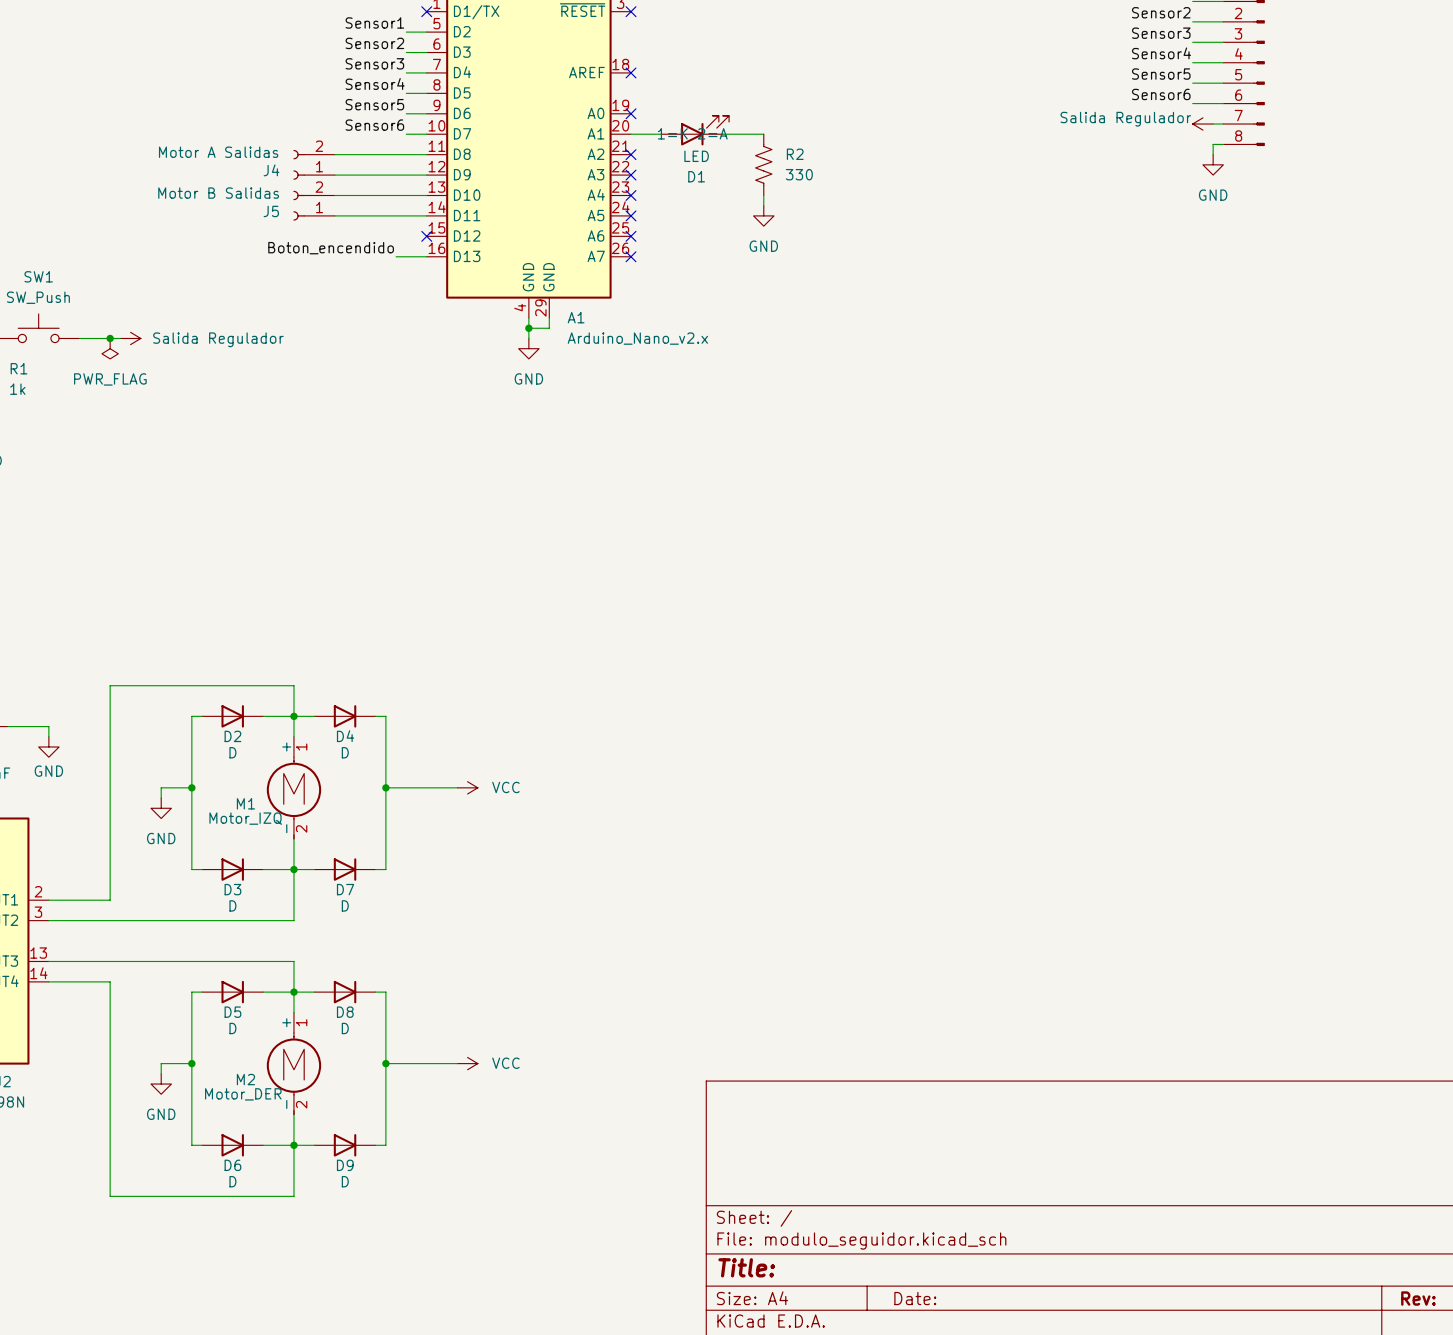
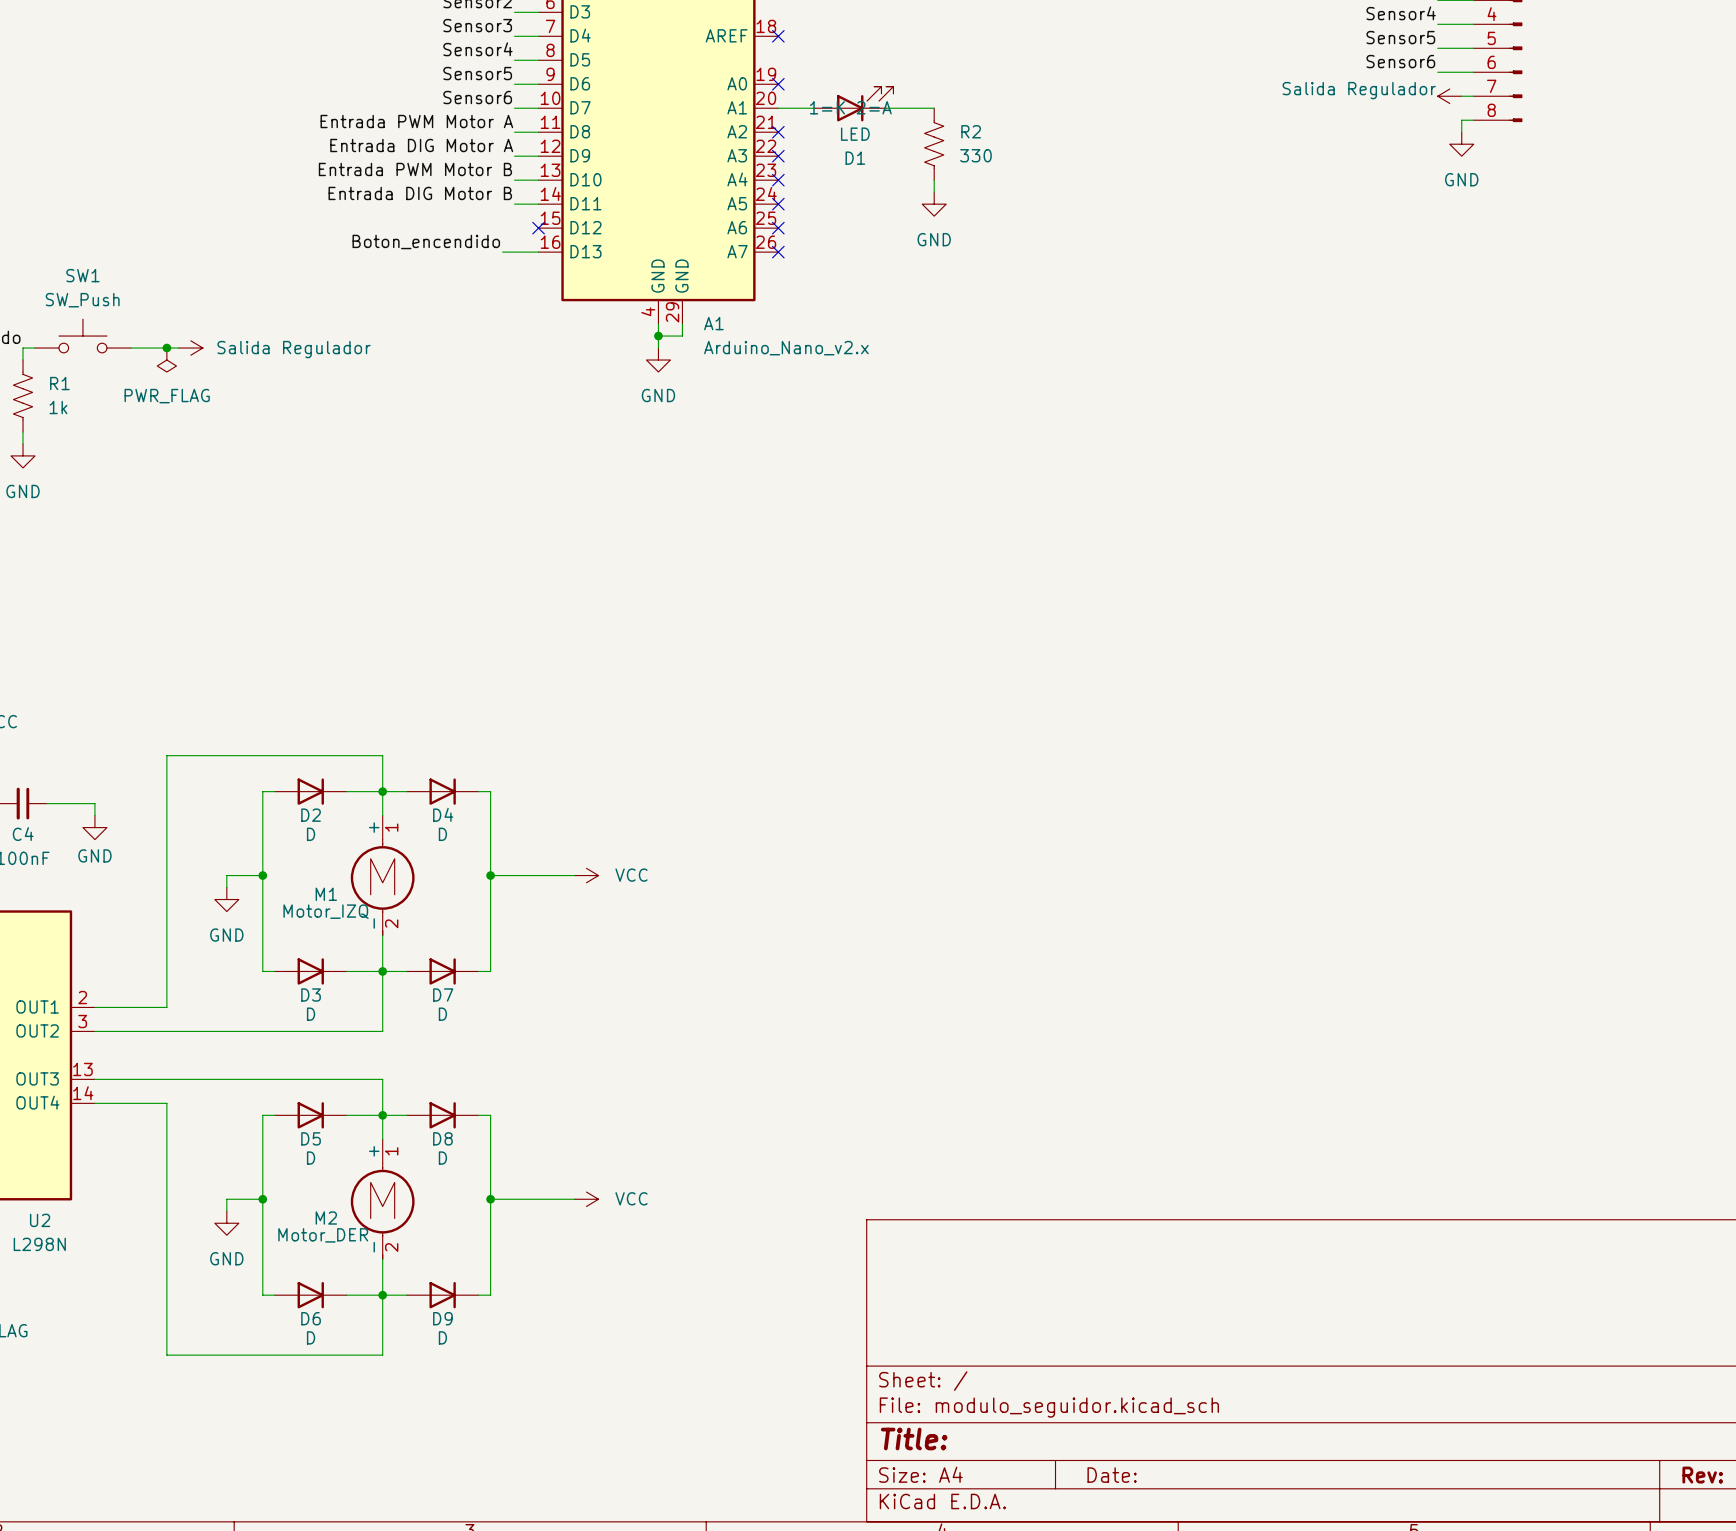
label: none -> Entrada PWM Motor A (416, 121)
wire: (334, 154) (406, 154) -> none
J4: Motor A Salidas (314, 164) -> none
label: none -> Entrada DIG Motor A (421, 145)
wire: (334, 175) (406, 175) -> none
label: none -> Entrada PWM Motor B (415, 169)
wire: (334, 195) (406, 195) -> none
J5: Motor B Salidas (314, 205) -> none
label: none -> Entrada DIG Motor B (420, 193)
wire: (334, 215) (406, 215) -> none

